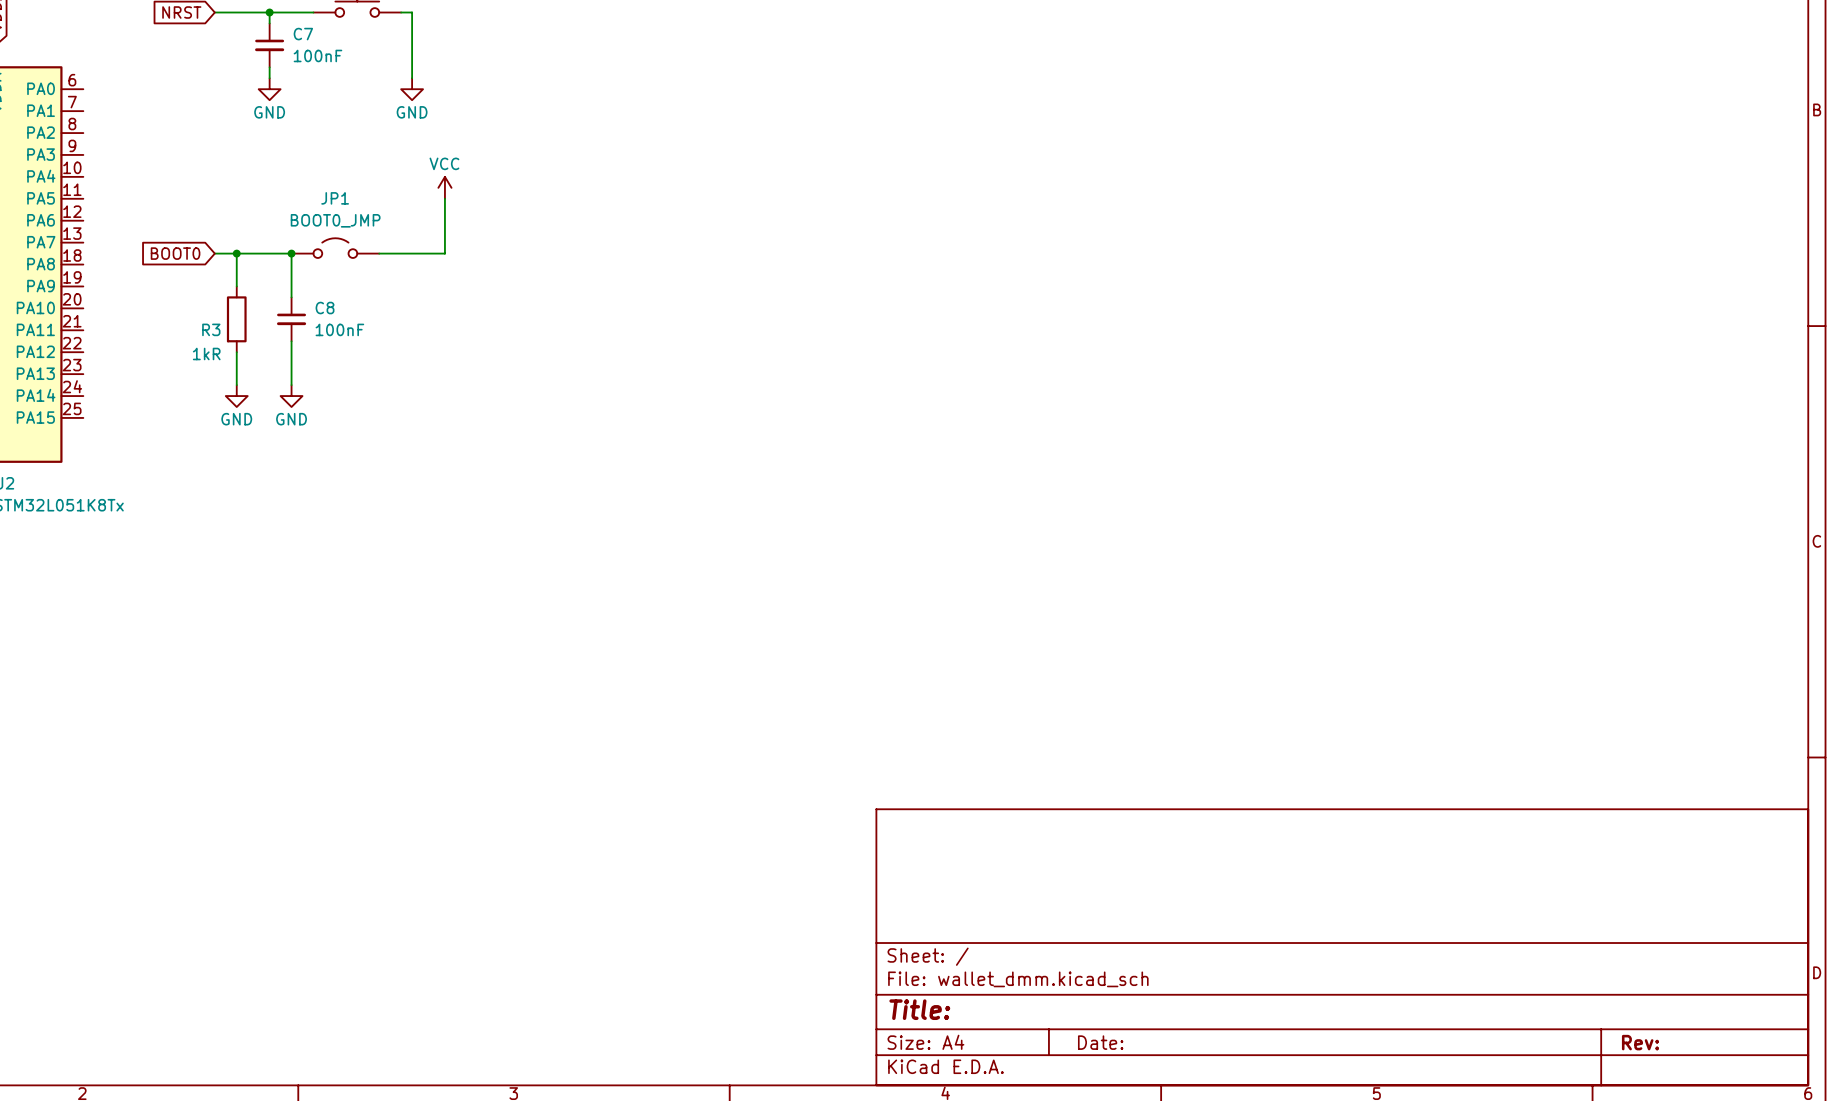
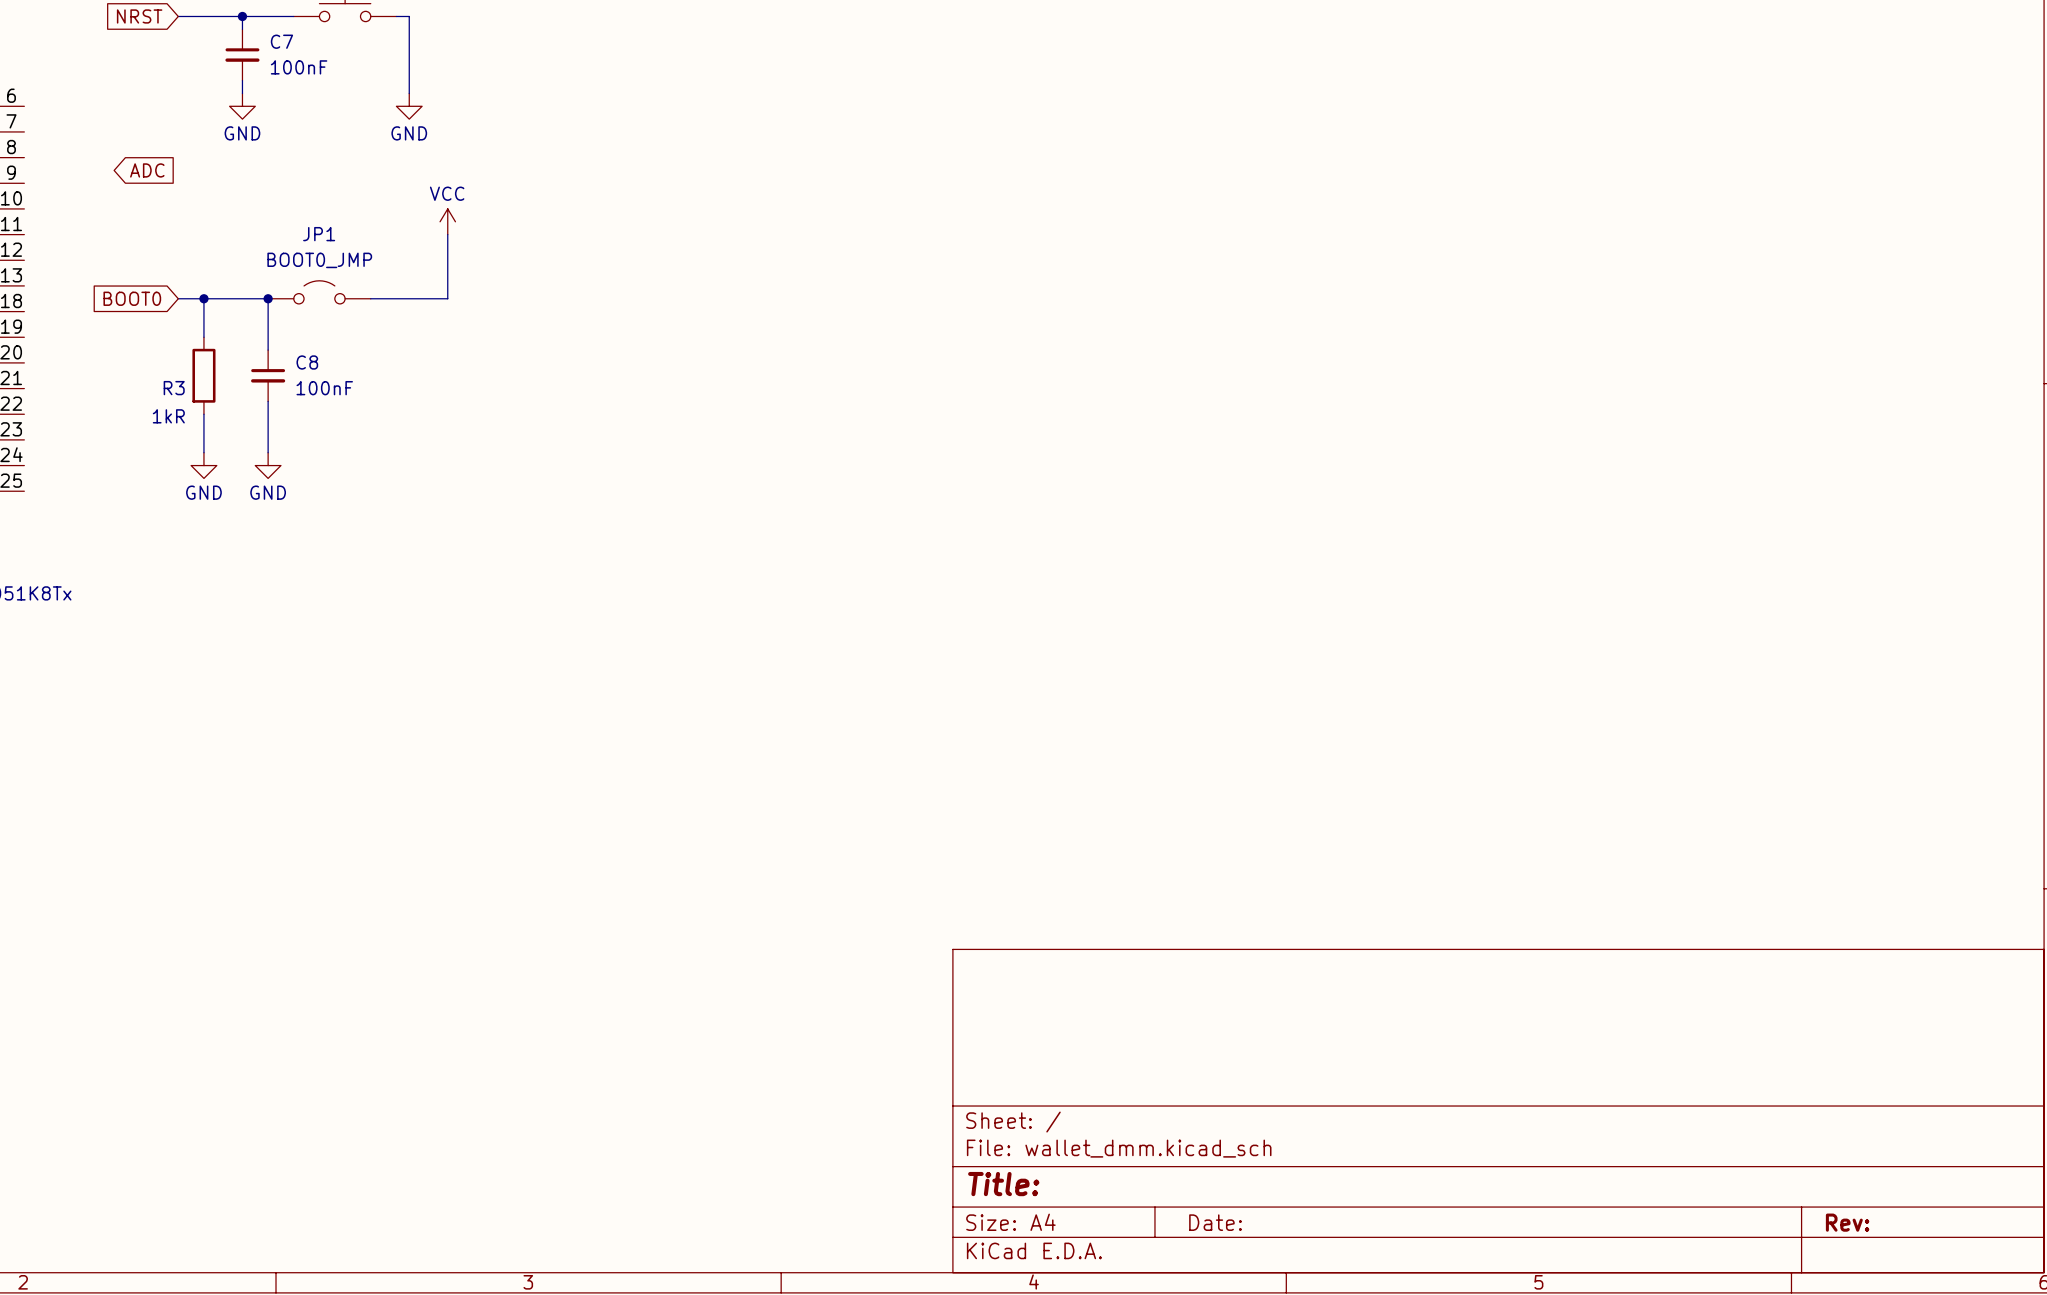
global label: none -> ADC (147, 170)

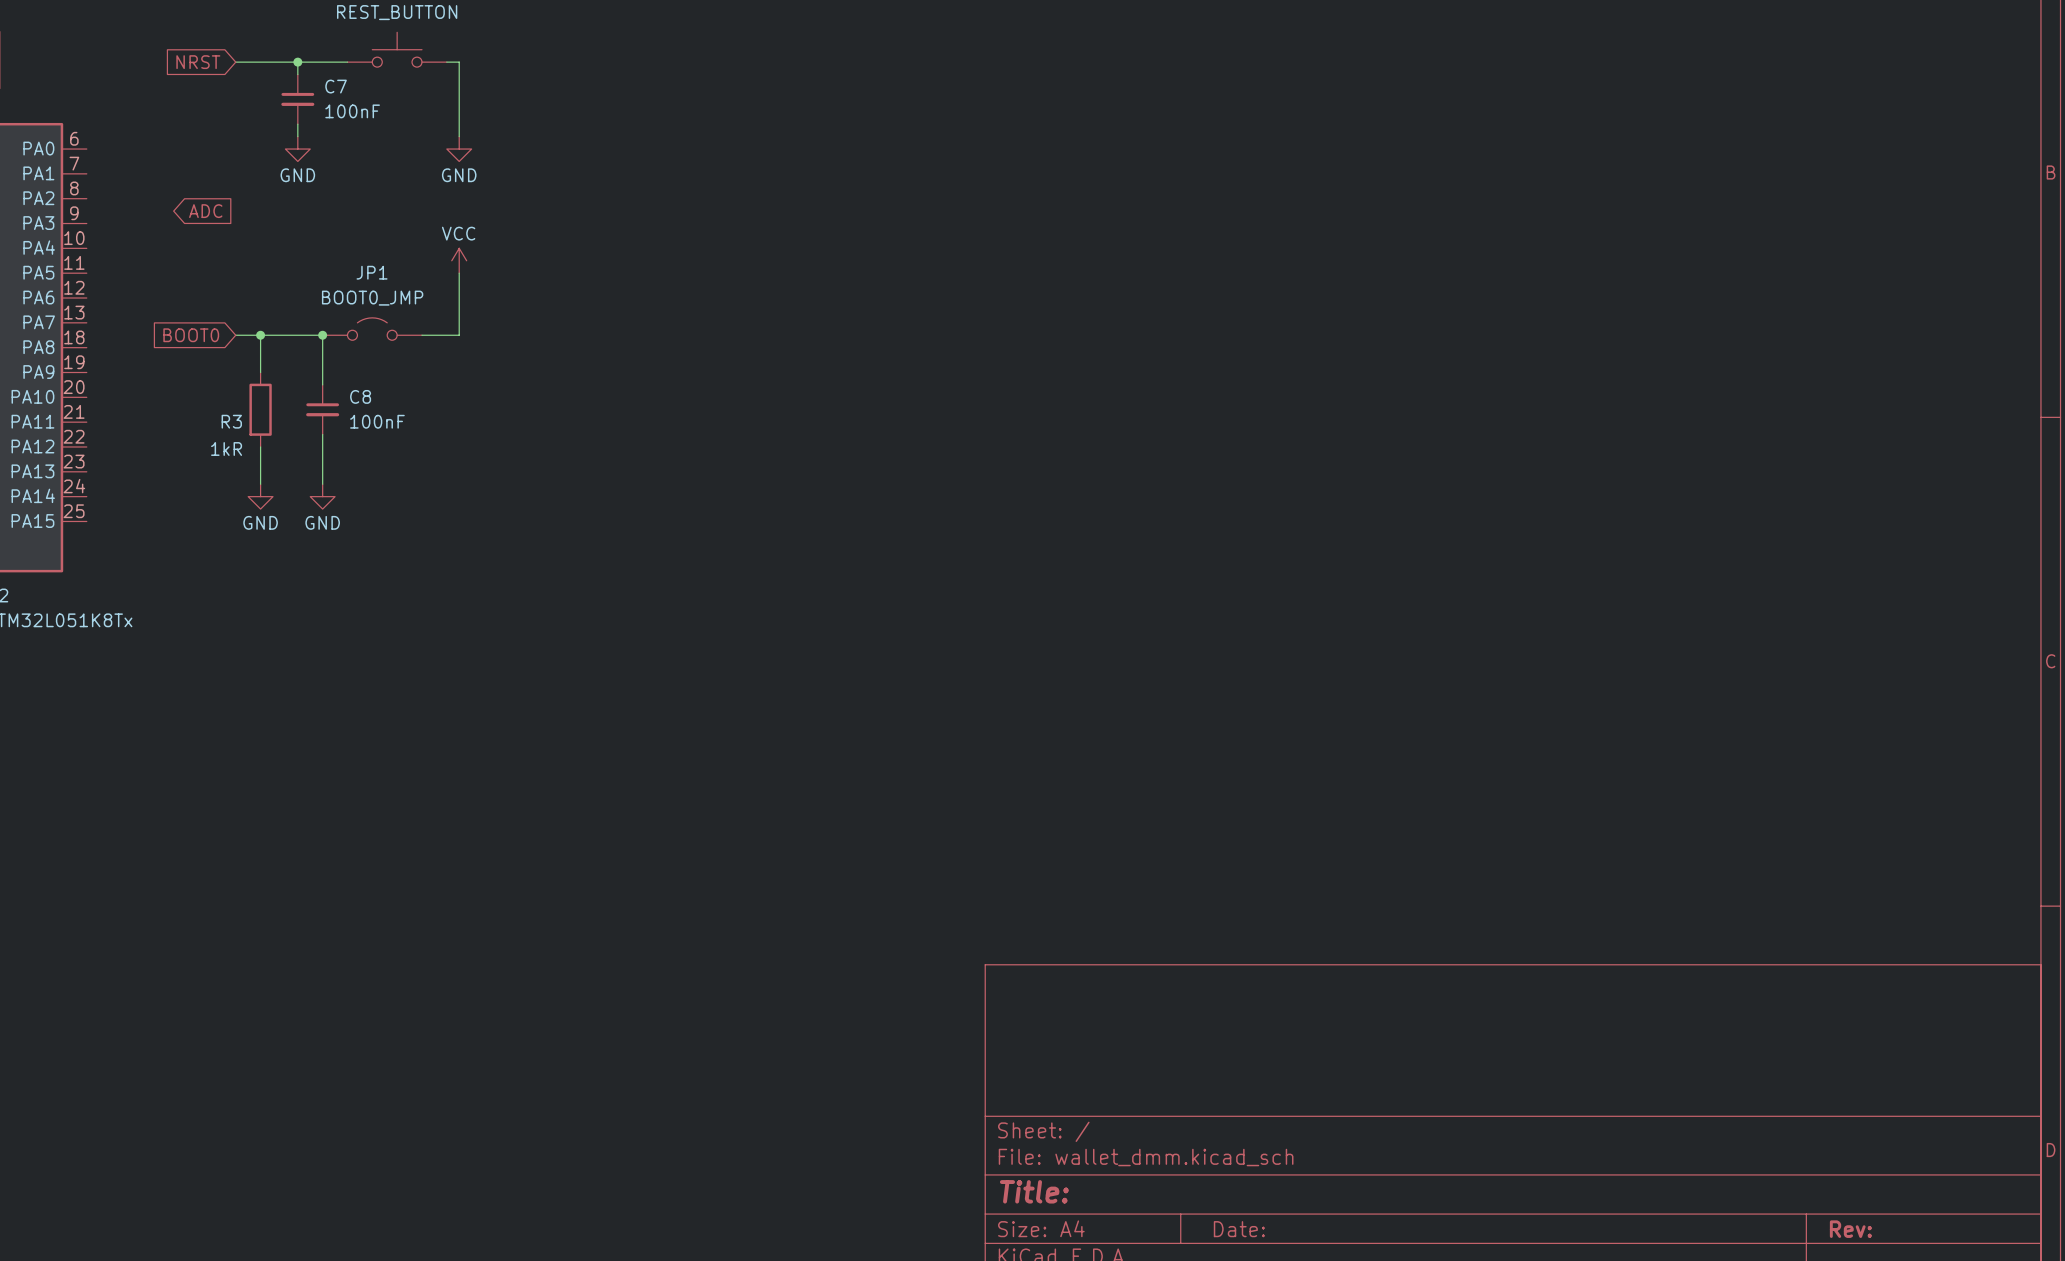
power symbol position: VCC (447, 221) -> VCC (459, 260)
wire: (447, 234) (447, 298) (409, 298) -> (459, 273) (459, 335)

